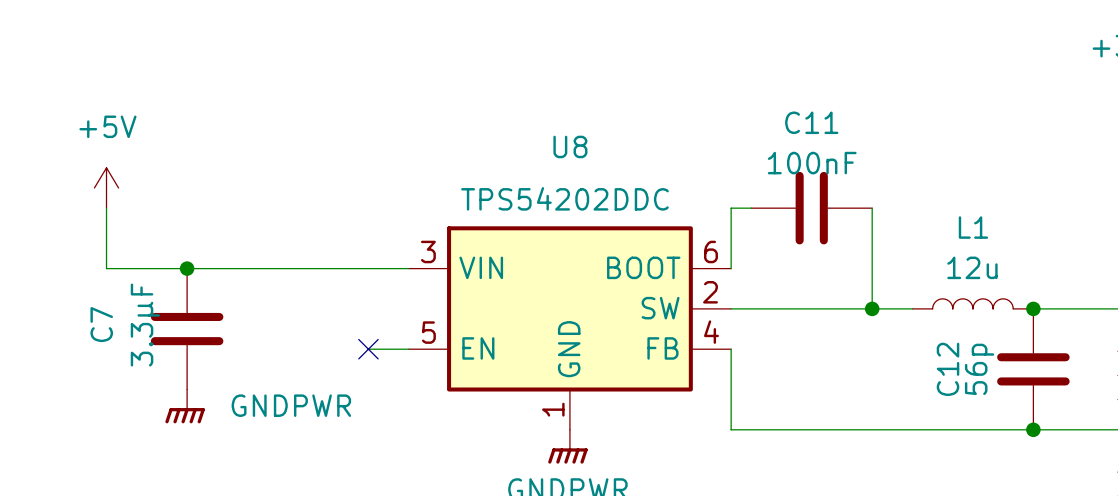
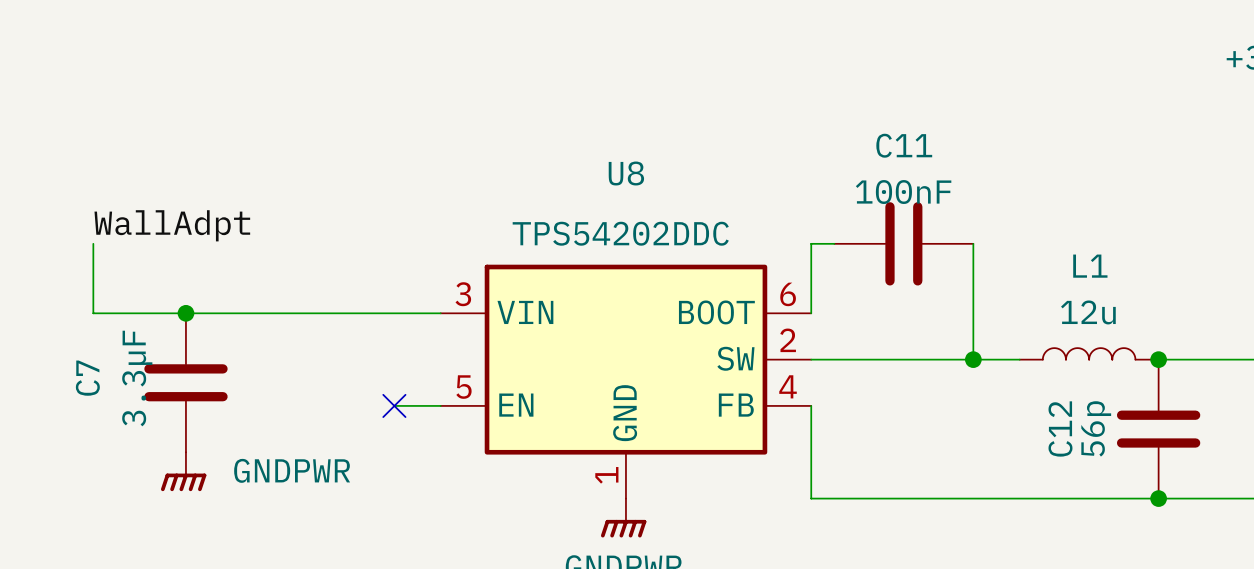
power symbol: +5V (106, 188) -> none
label: none -> WallAdpt (172, 225)

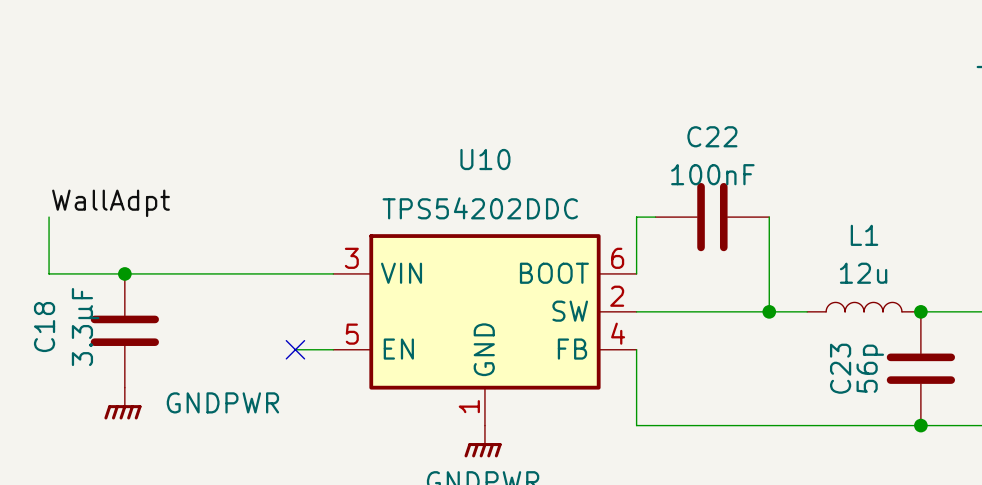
C11 name: C11 (904, 145) -> C22 (712, 136)
U8 name: U8 (626, 173) -> U10 (485, 159)
C7 name: C7 (87, 378) -> C18 (44, 327)
C12 name: C12 (1060, 428) -> C23 (840, 368)

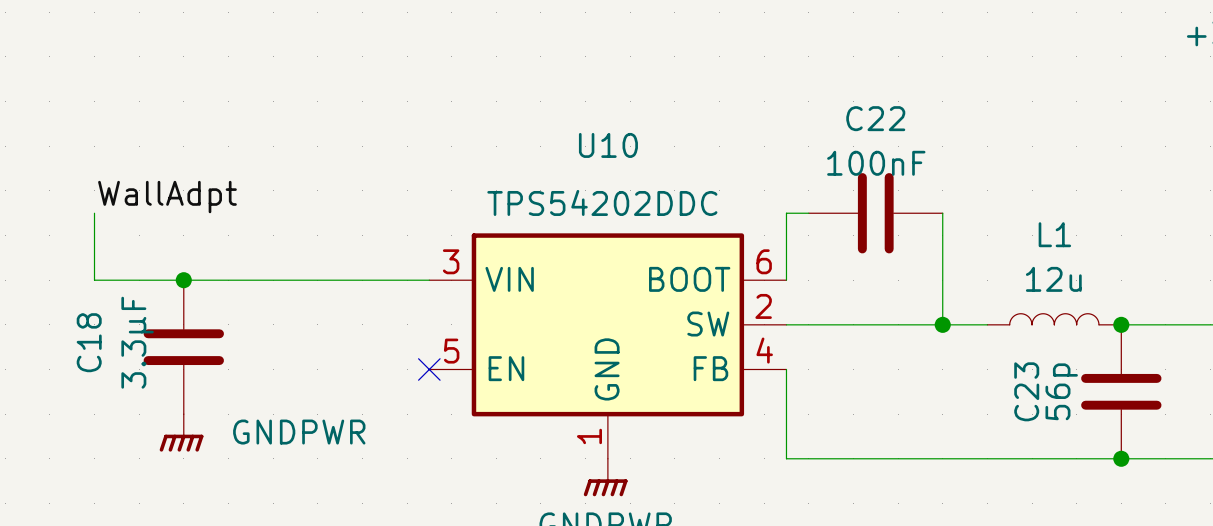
wire: (295, 349) (333, 349) -> none
no-connect mark position: (295, 349) -> (429, 369)

